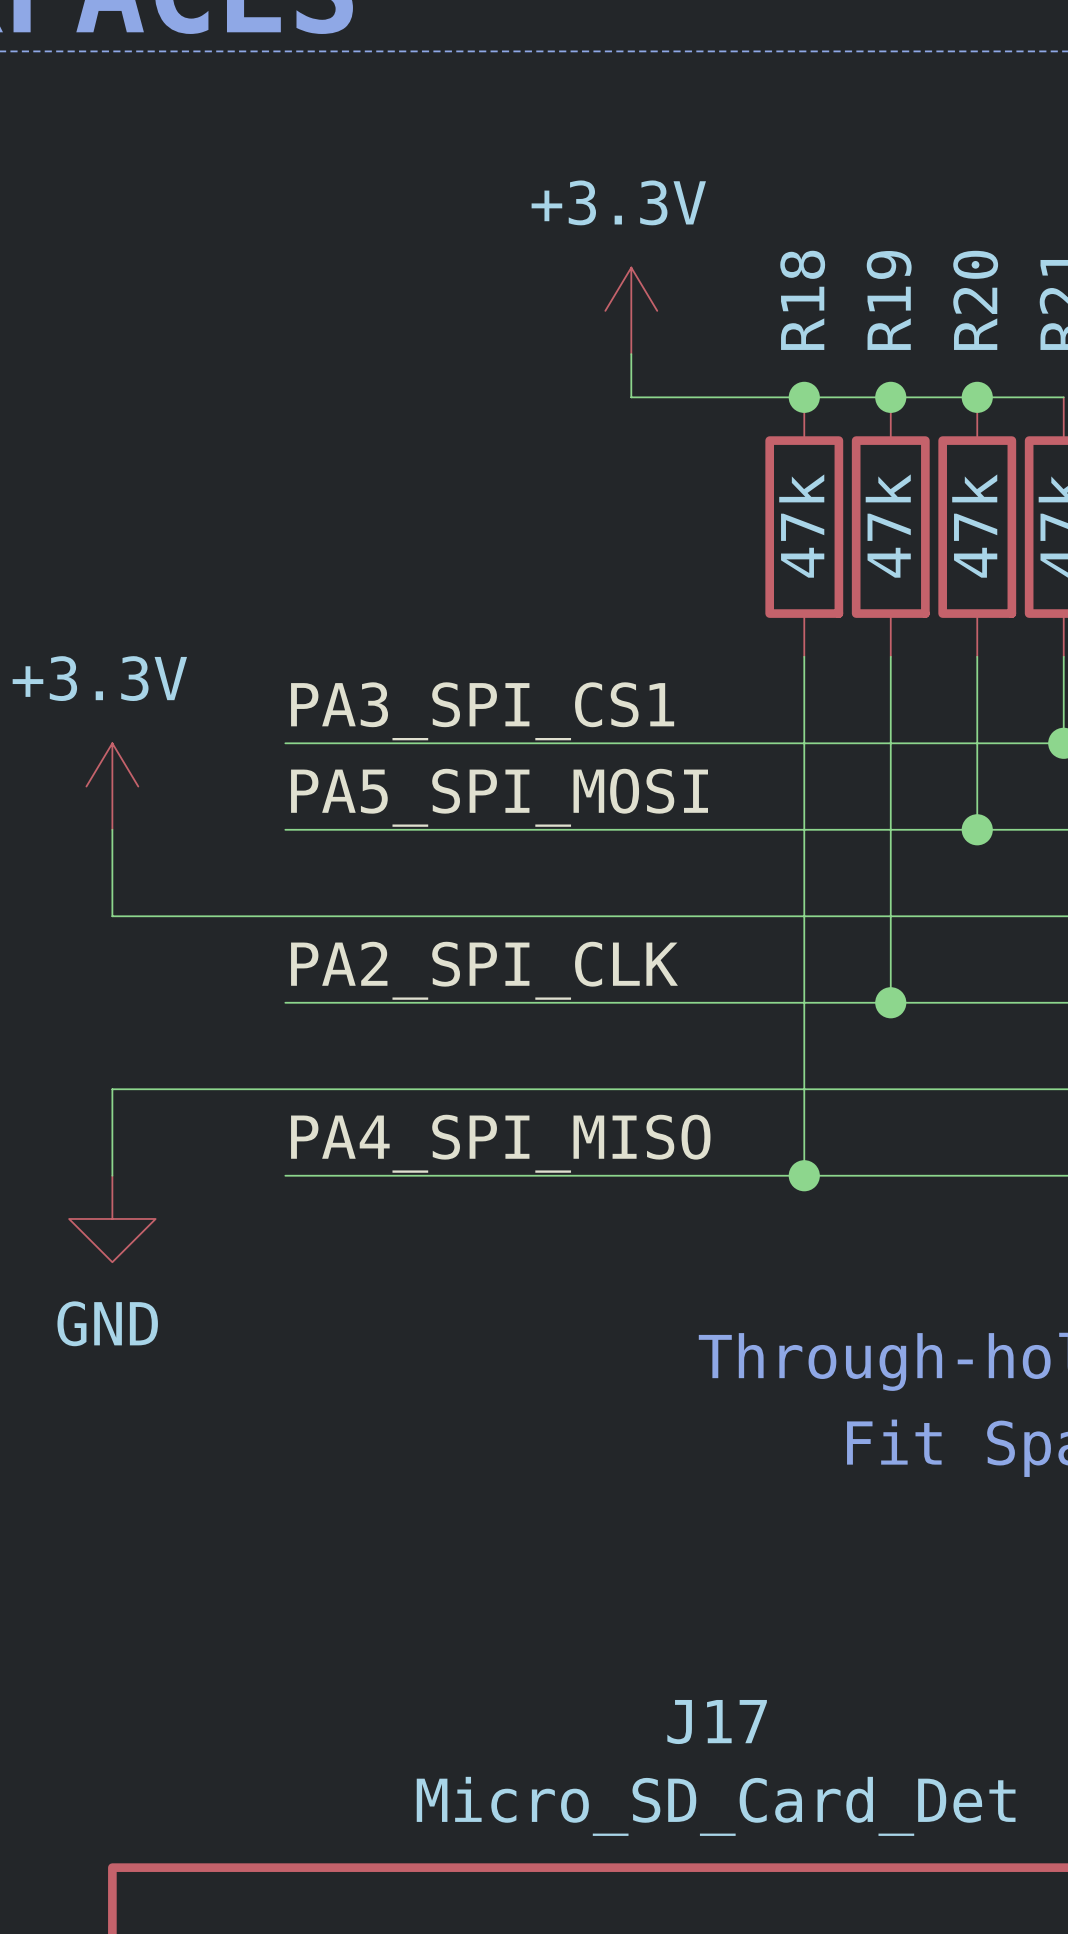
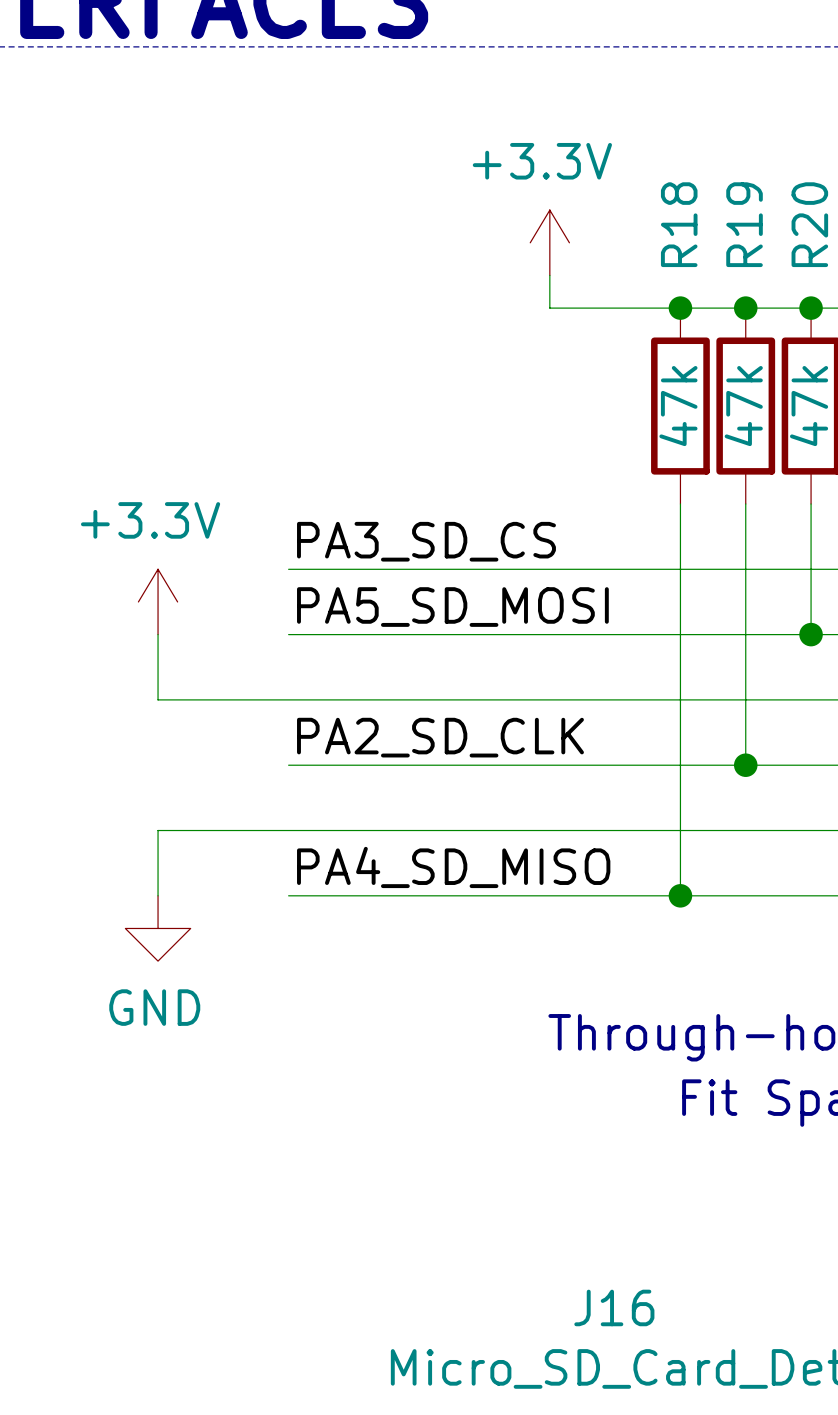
label: PA3_SPI_CS1 (482, 711) -> PA3_SD_CS (426, 541)
label: PA5_SPI_MOSI (499, 797) -> PA5_SD_MOSI (452, 607)
label: PA2_SPI_CLK (484, 970) -> PA2_SD_CLK (440, 737)
label: PA4_SPI_MISO (500, 1143) -> PA4_SD_MISO (453, 867)
J17 name: J17 (717, 1722) -> J16 (614, 1307)

